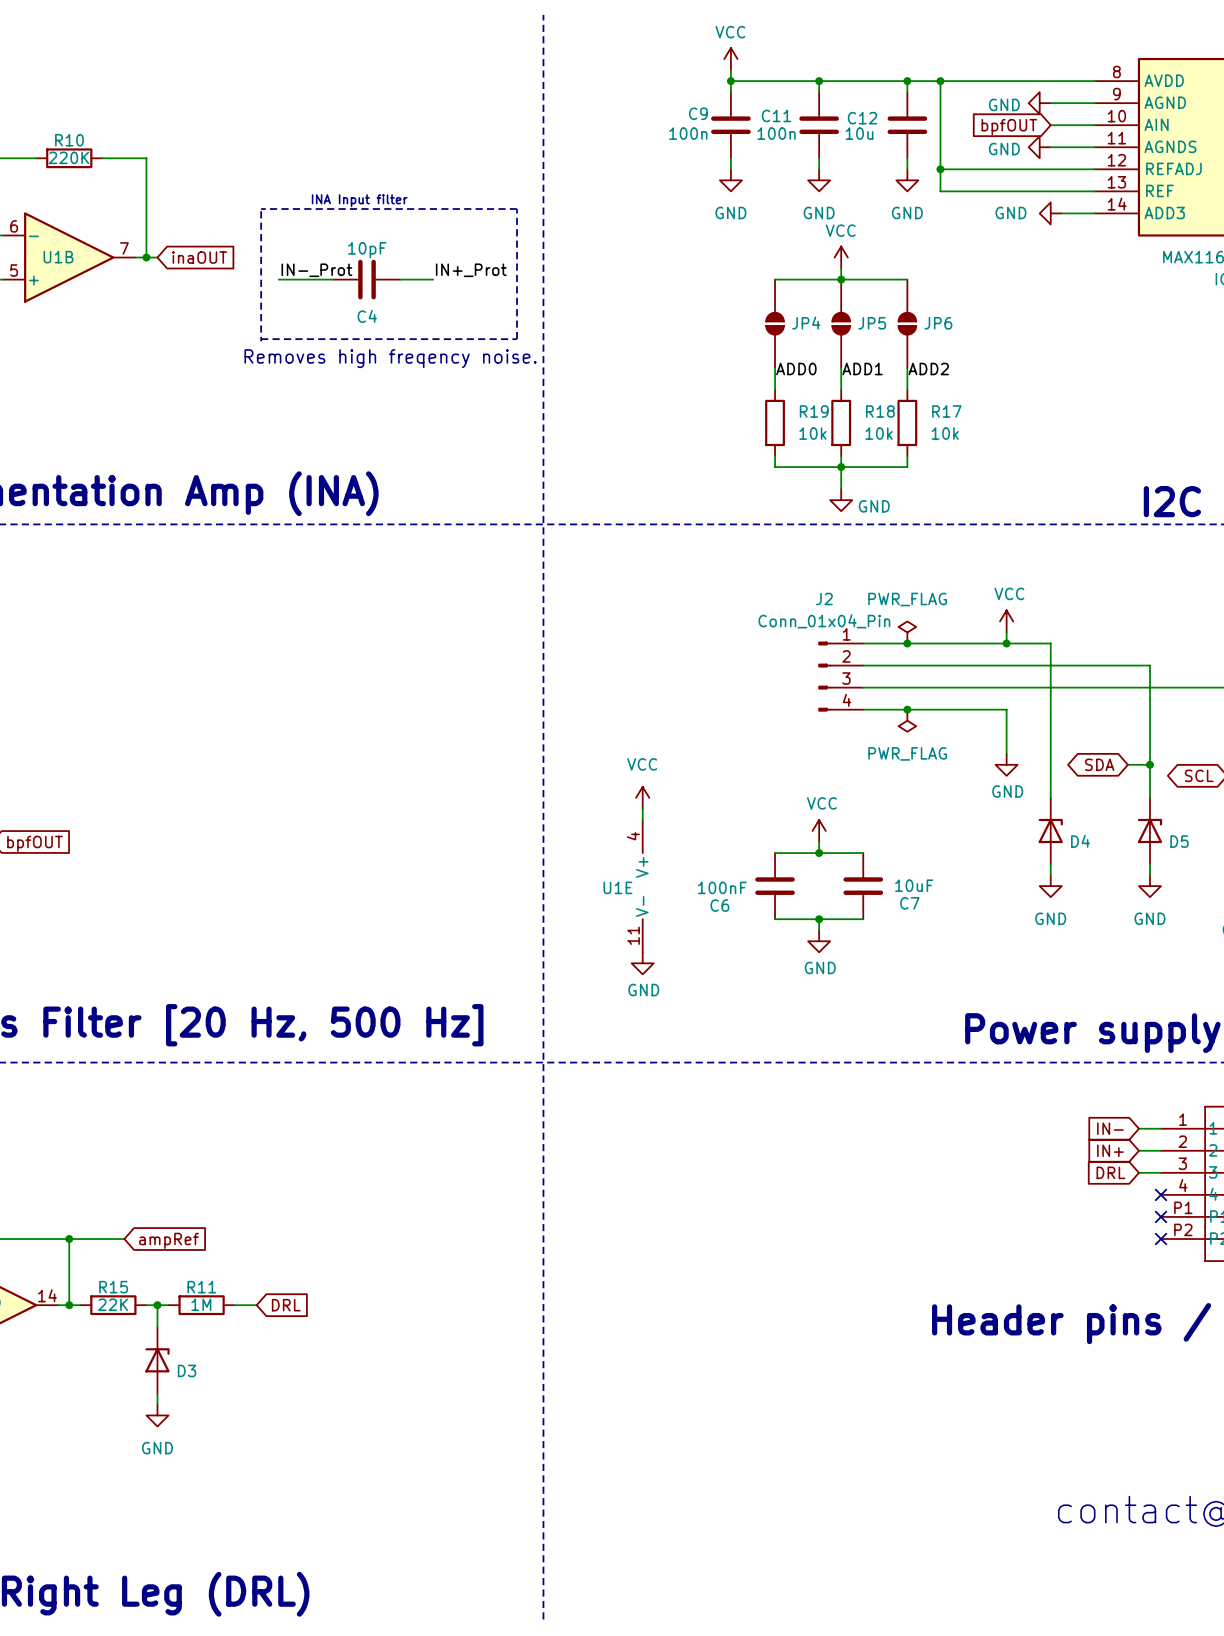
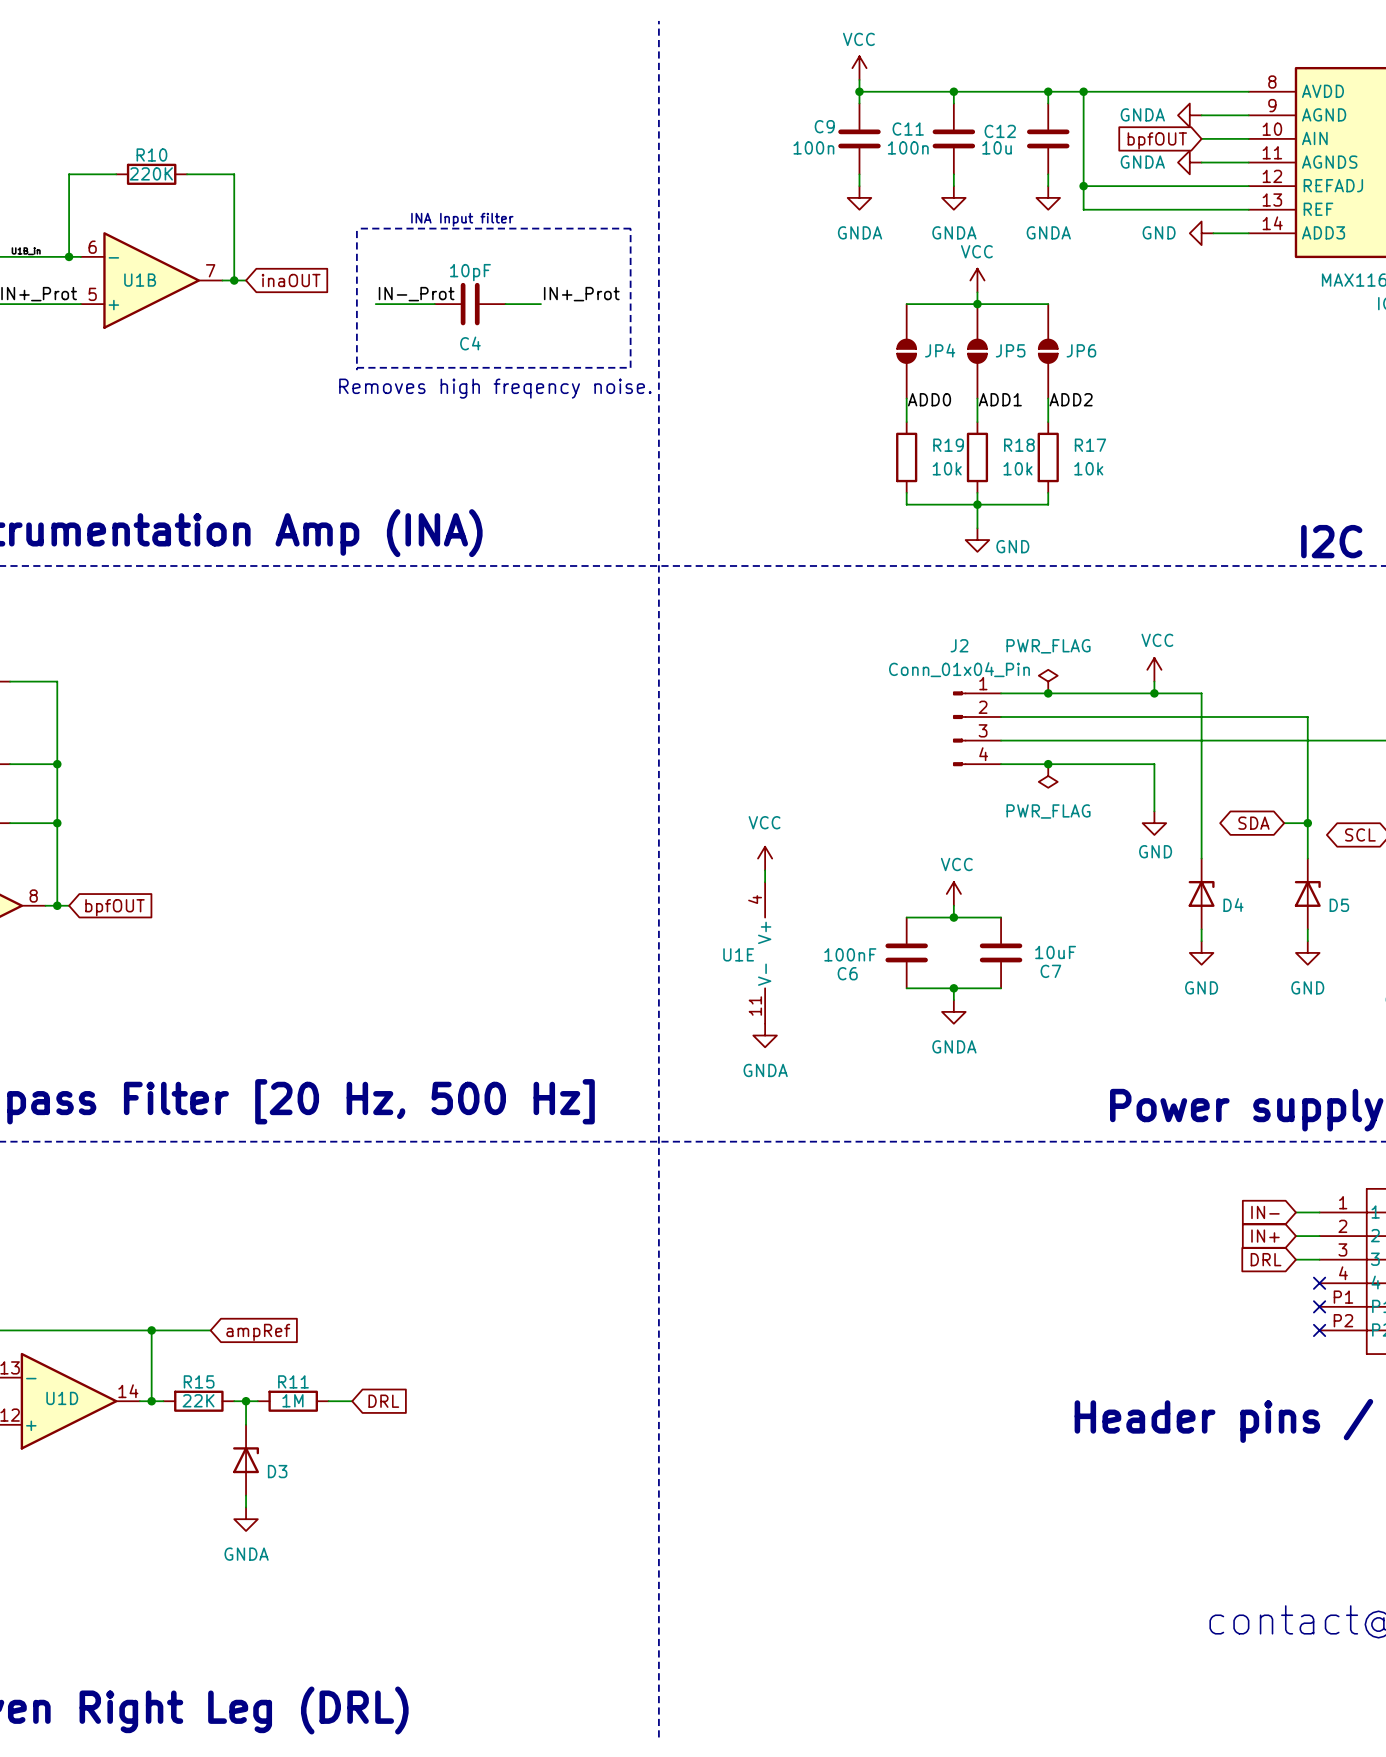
power symbol: GND (1039, 103) -> GNDA (1189, 115)
power symbol: GND (1039, 147) -> GNDA (1189, 162)
power symbol: GND (730, 180) -> GNDA (859, 197)
power symbol: GND (819, 180) -> GNDA (953, 197)
power symbol: GND (907, 180) -> GNDA (1048, 197)
power symbol: GND (819, 941) -> GNDA (953, 1011)
power symbol: GND (642, 963) -> GNDA (765, 1035)
power symbol: GND (157, 1415) -> GNDA (246, 1519)

